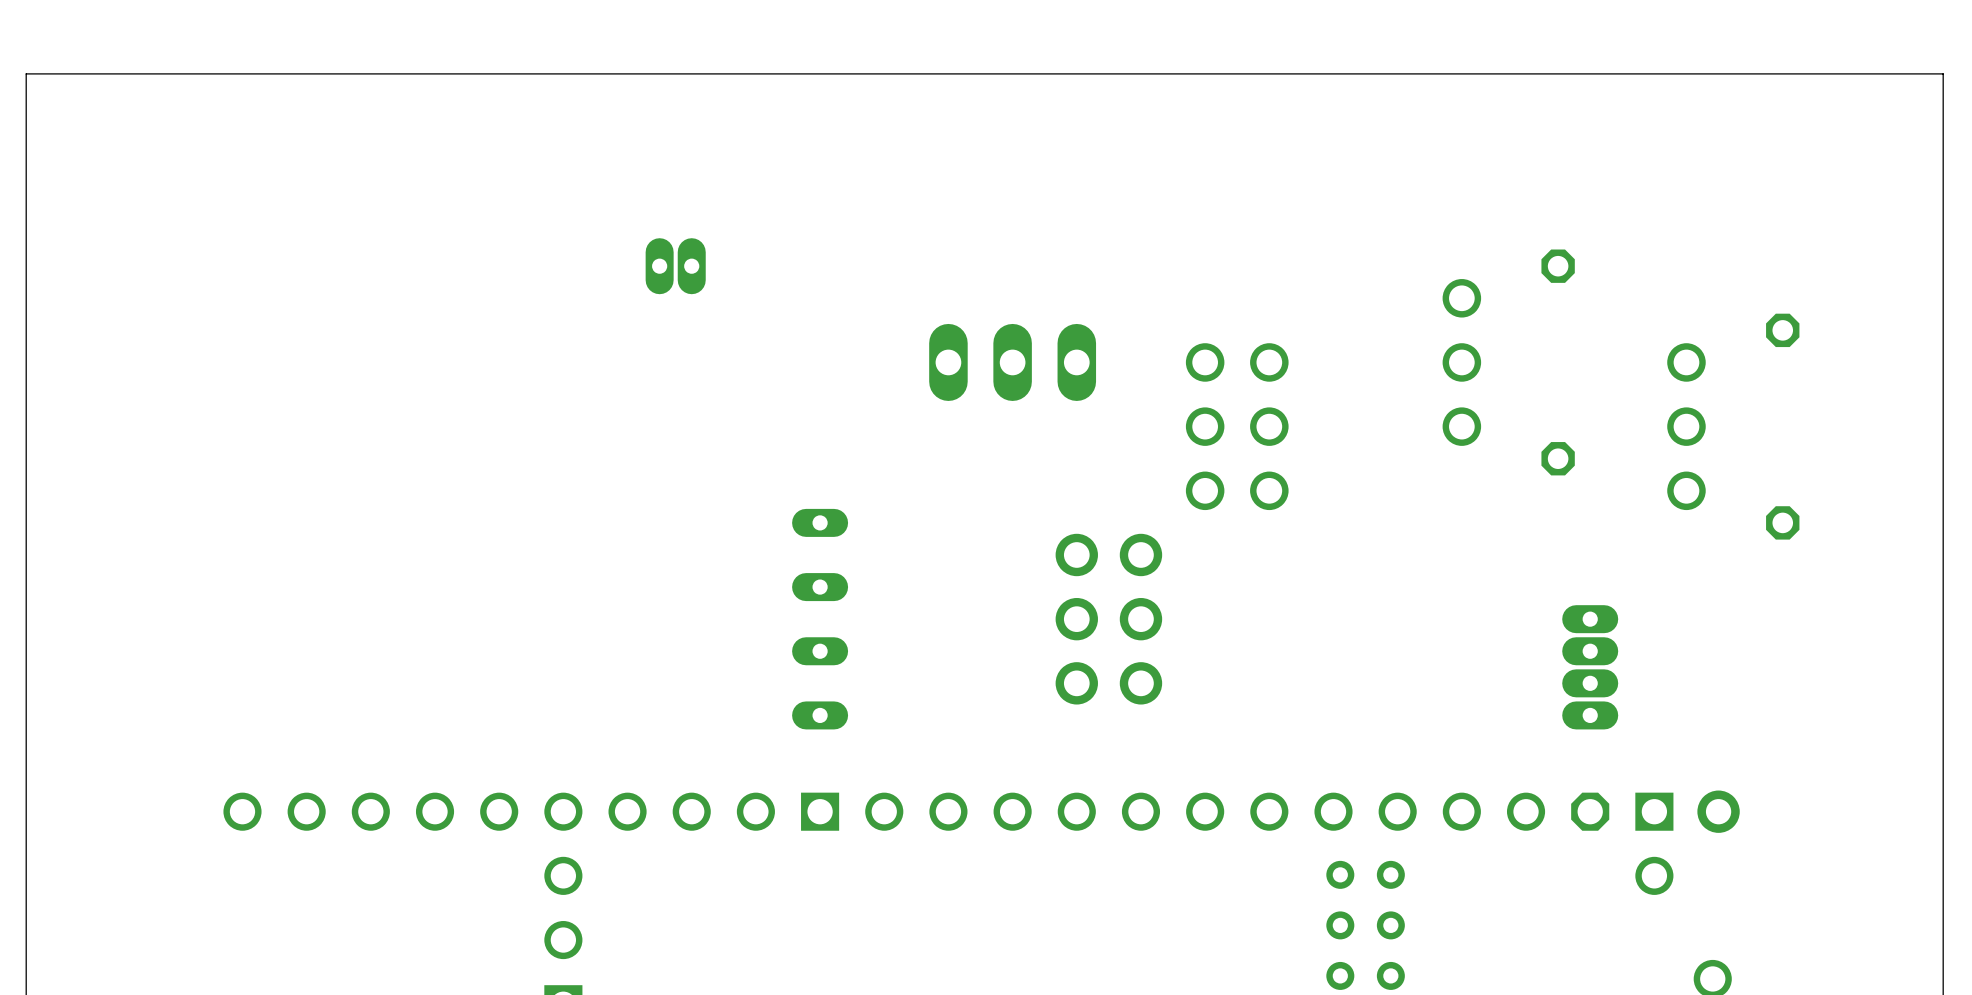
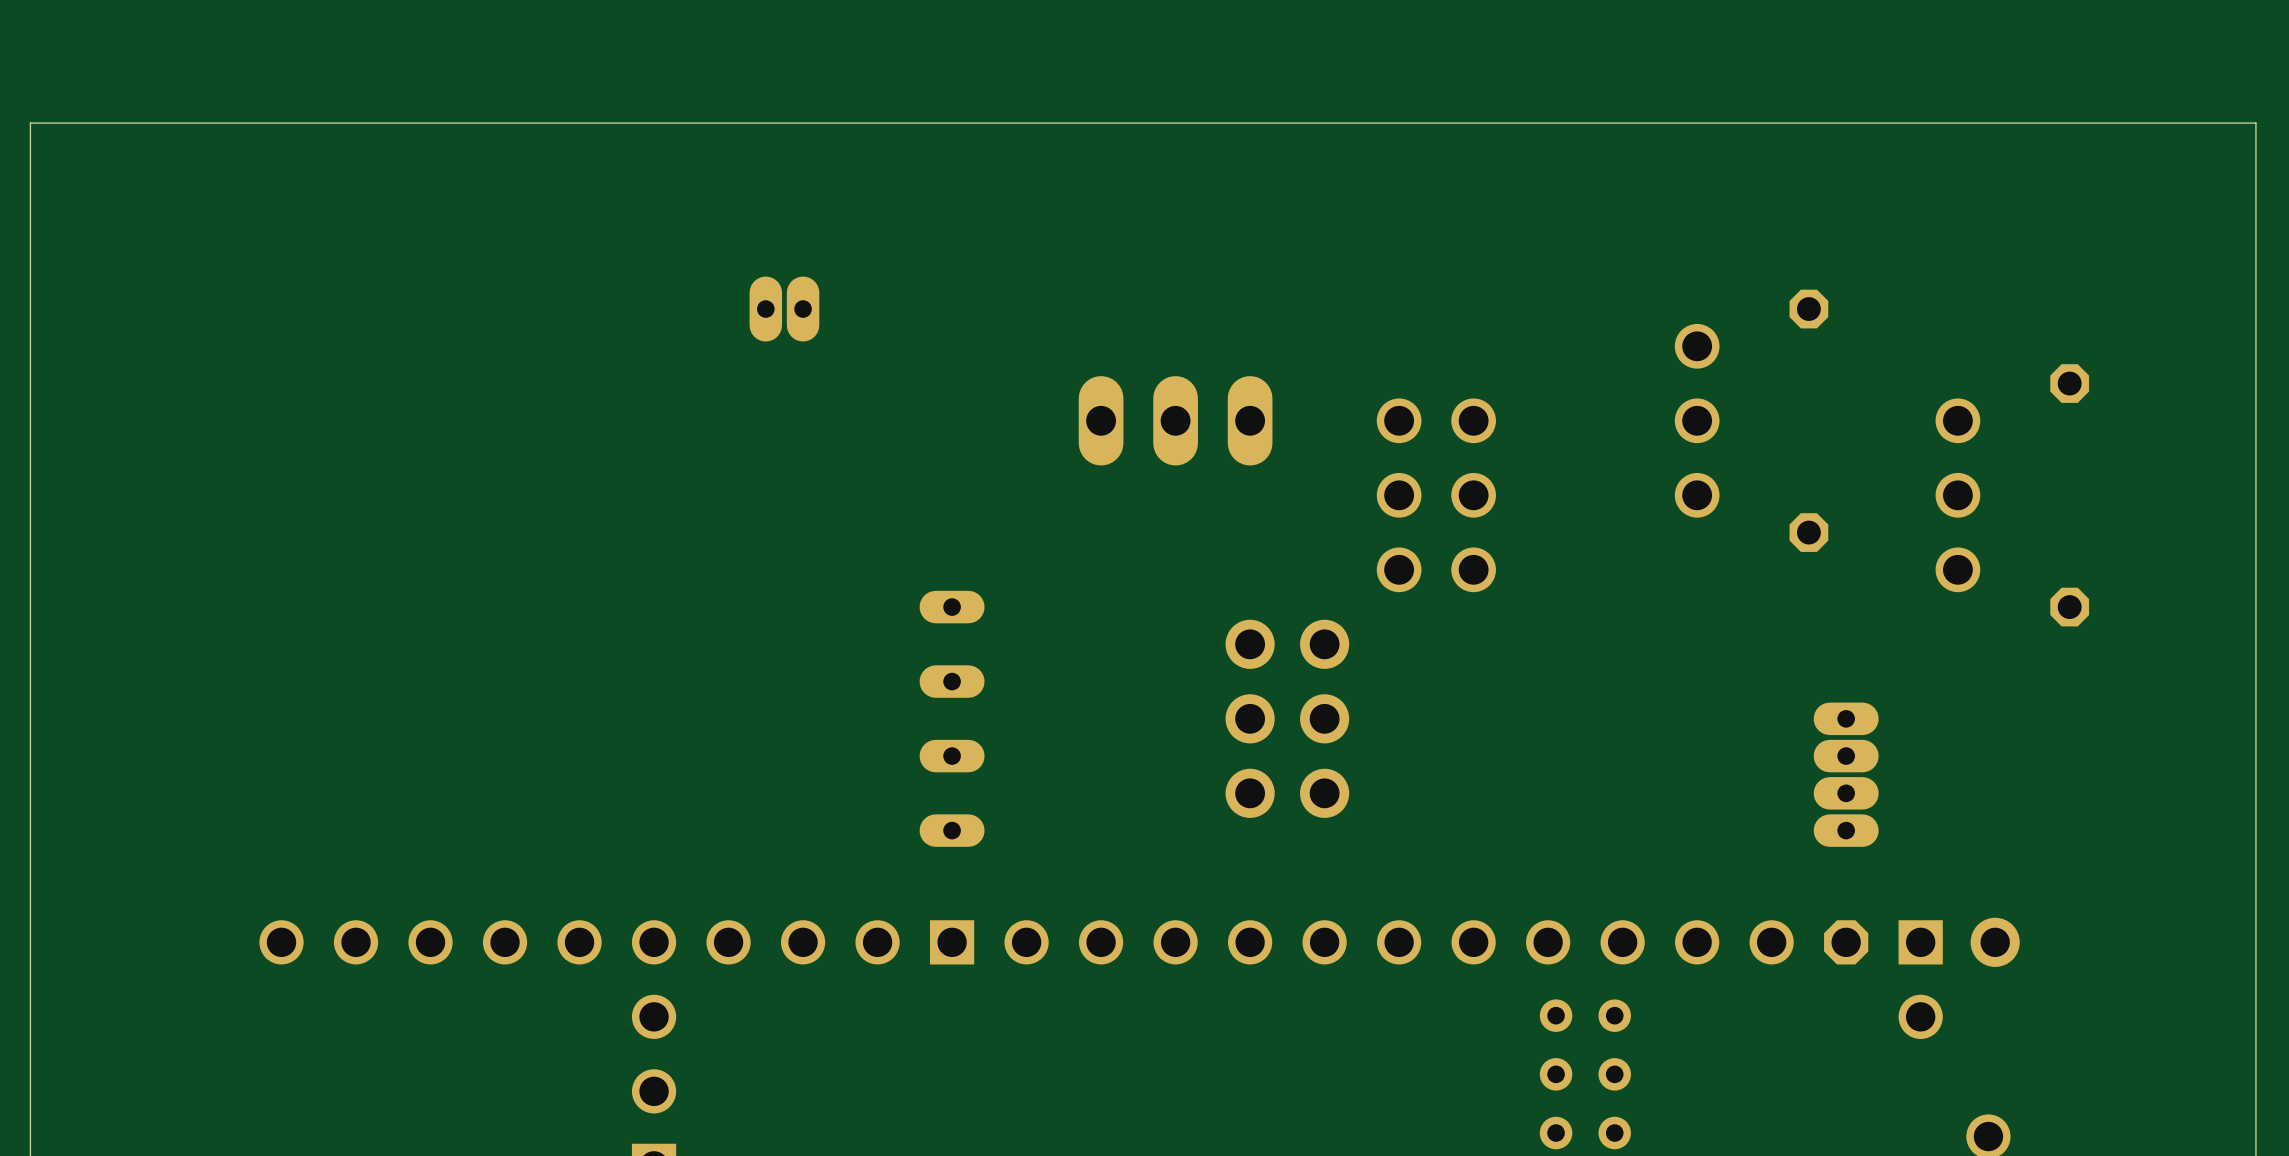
board edge: (1943, 106) (1943, 73) (26, 73) (26, 106) -> (2255, 123) (30, 123)

